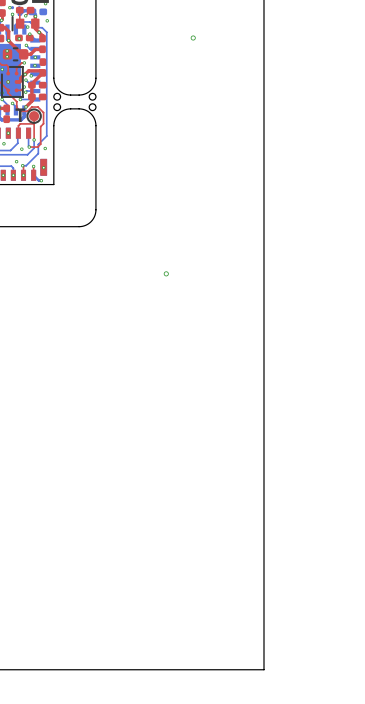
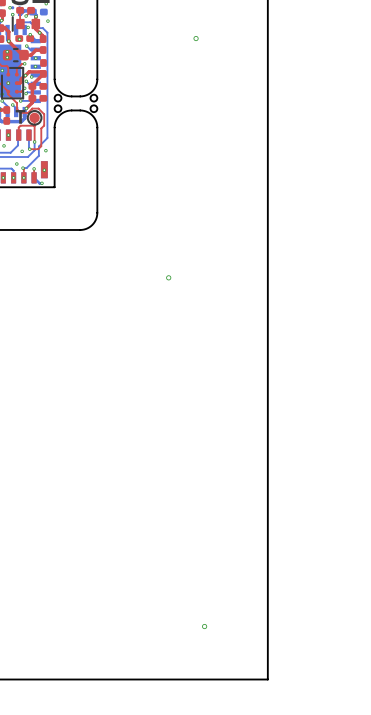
via: none -> (204, 626)

